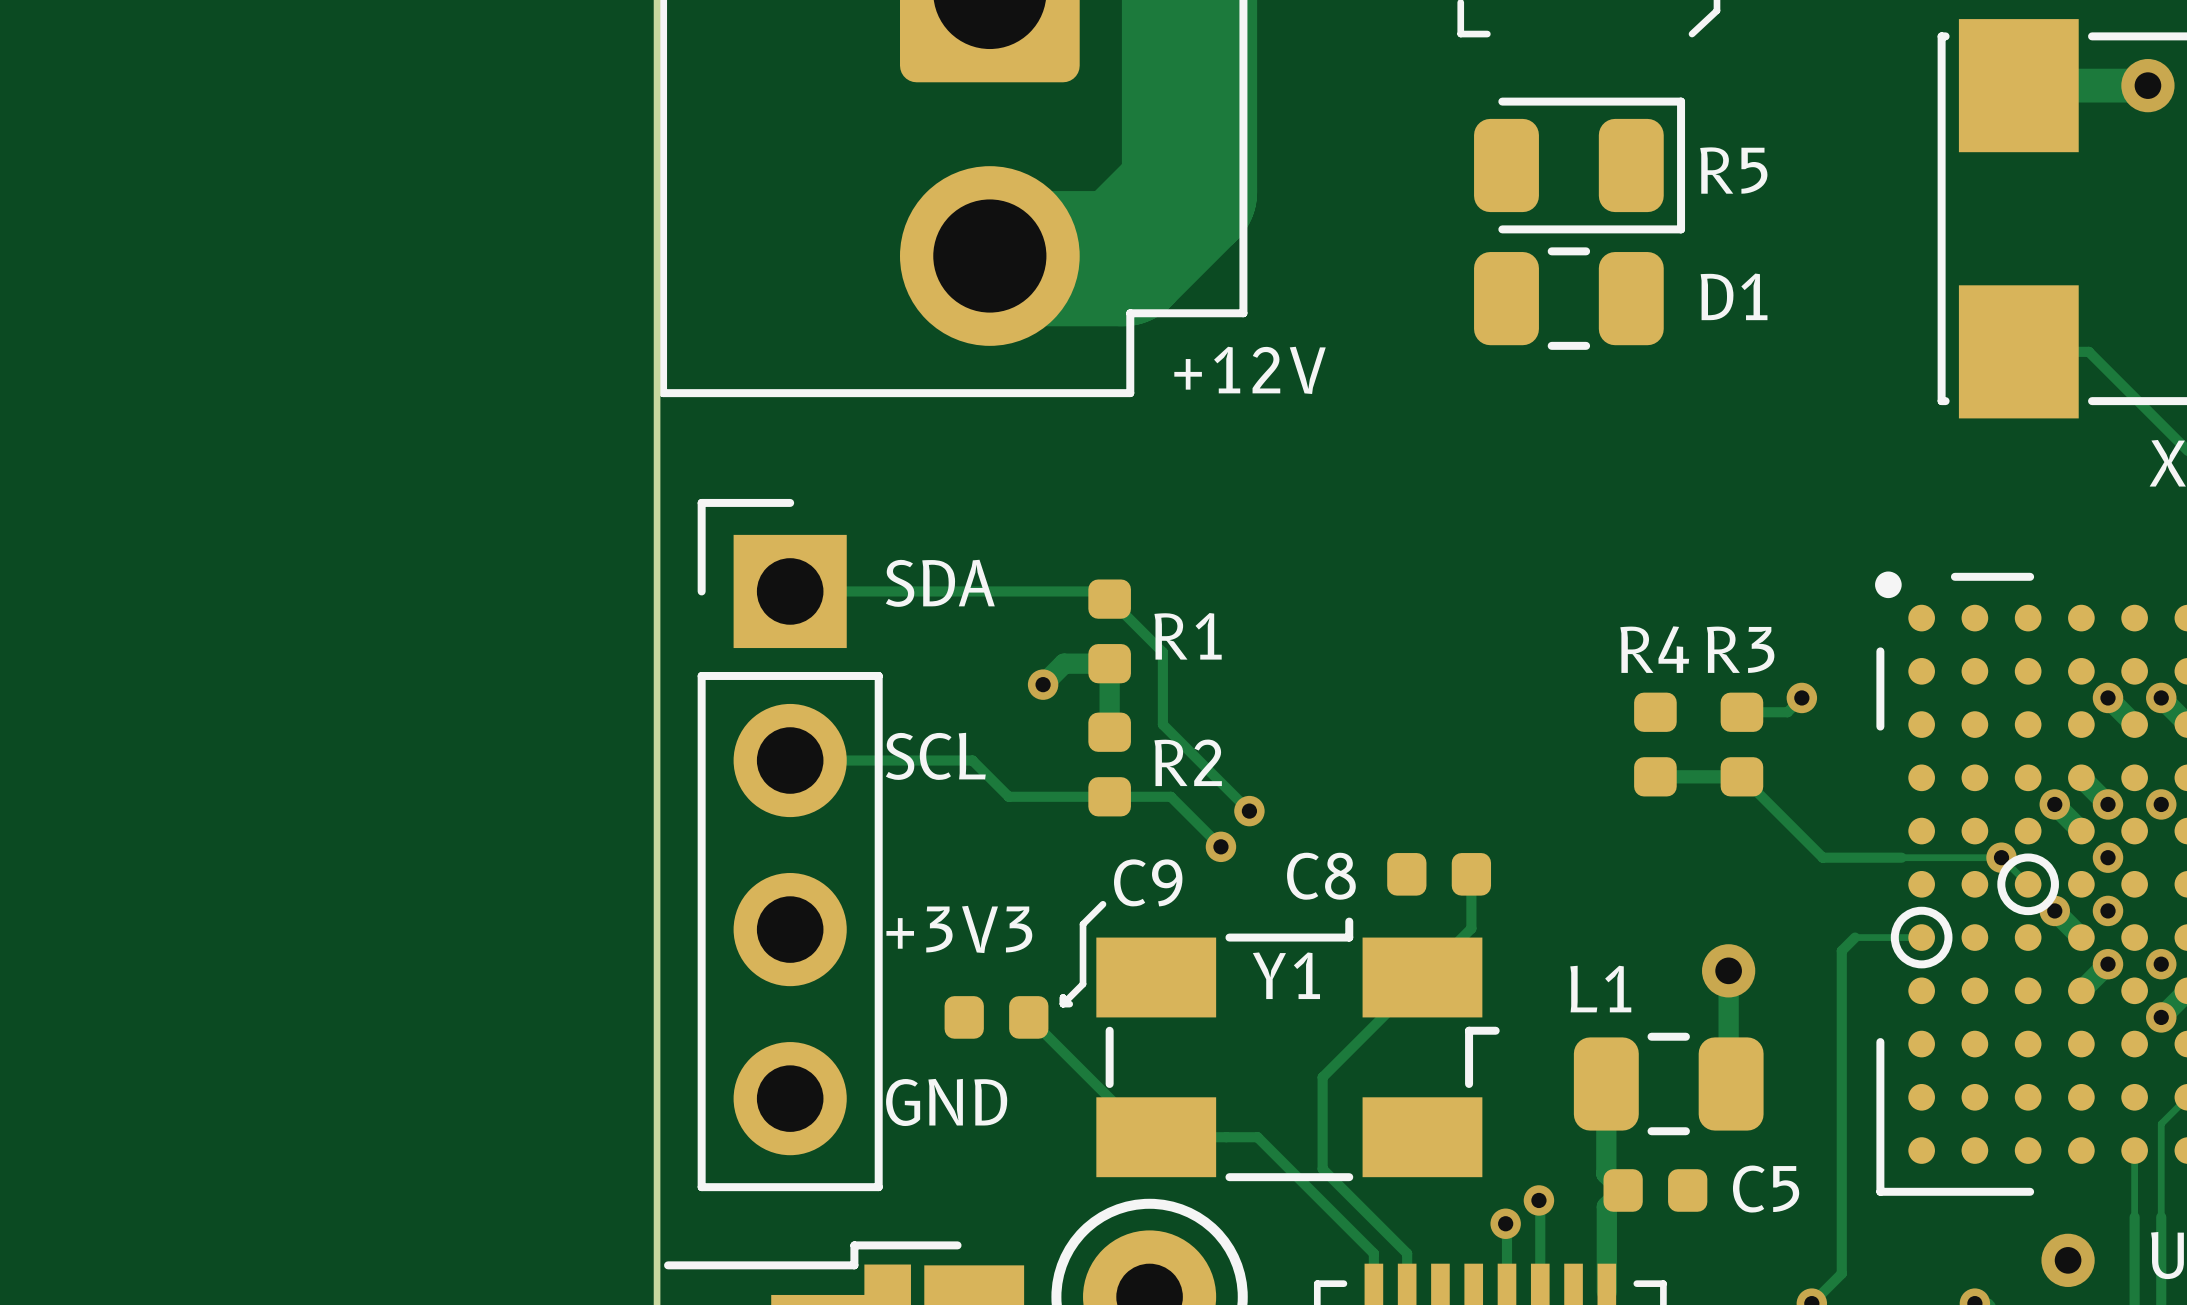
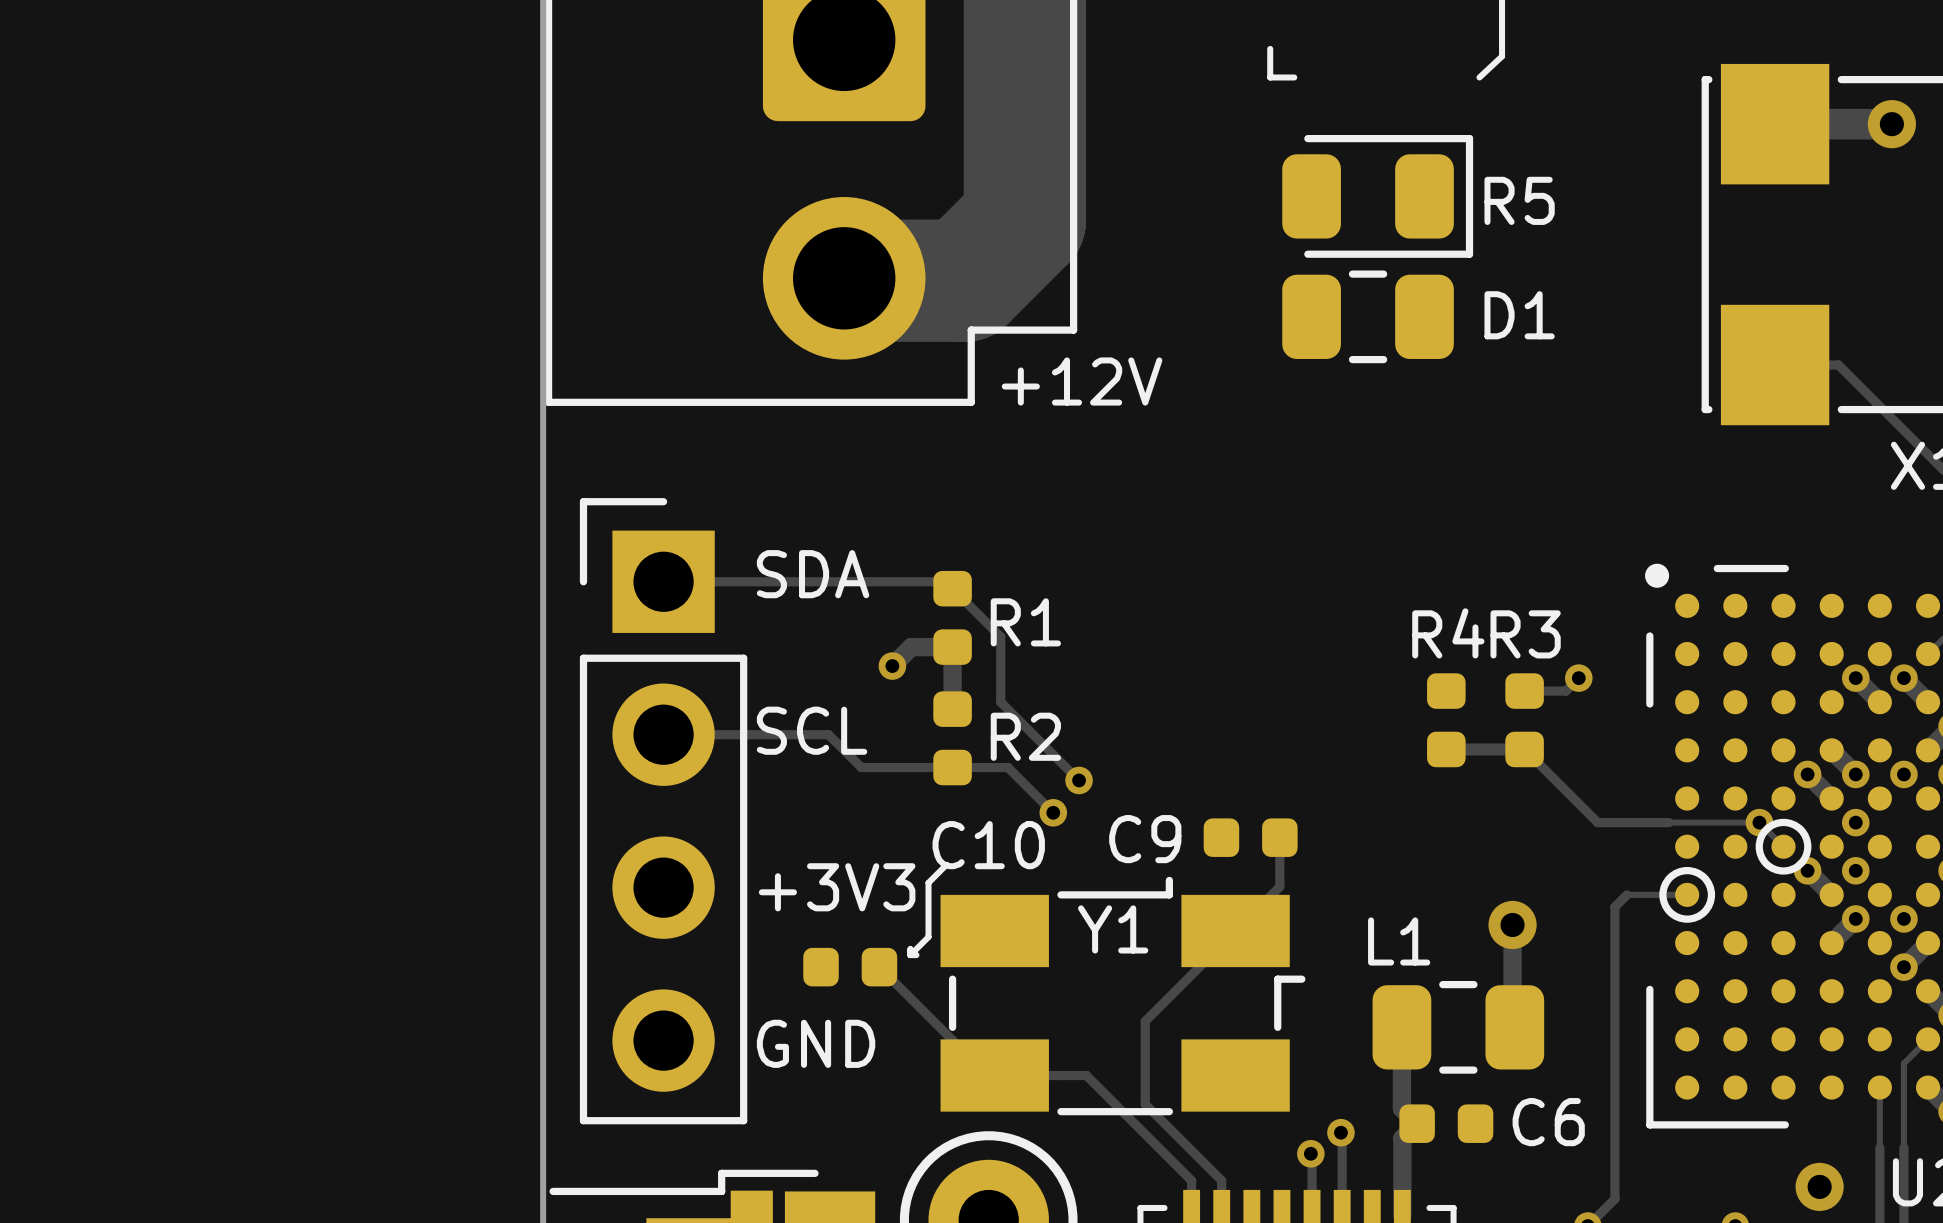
C8 name: C8 (1321, 876) -> C9 (1145, 839)
C9 name: C9 (1148, 882) -> C10 (988, 845)
C5 name: C5 (1766, 1189) -> C6 (1548, 1122)

